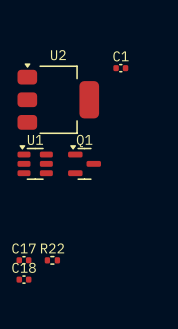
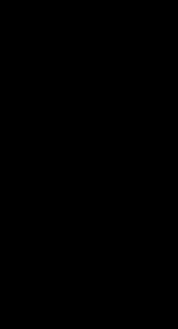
C1: (120, 68) -> none
U2: (58, 98) -> none
U1: (35, 162) -> none
Q1: (84, 162) -> none
C17: (23, 260) -> none
R22: (52, 260) -> none
C18: (23, 279) -> none

